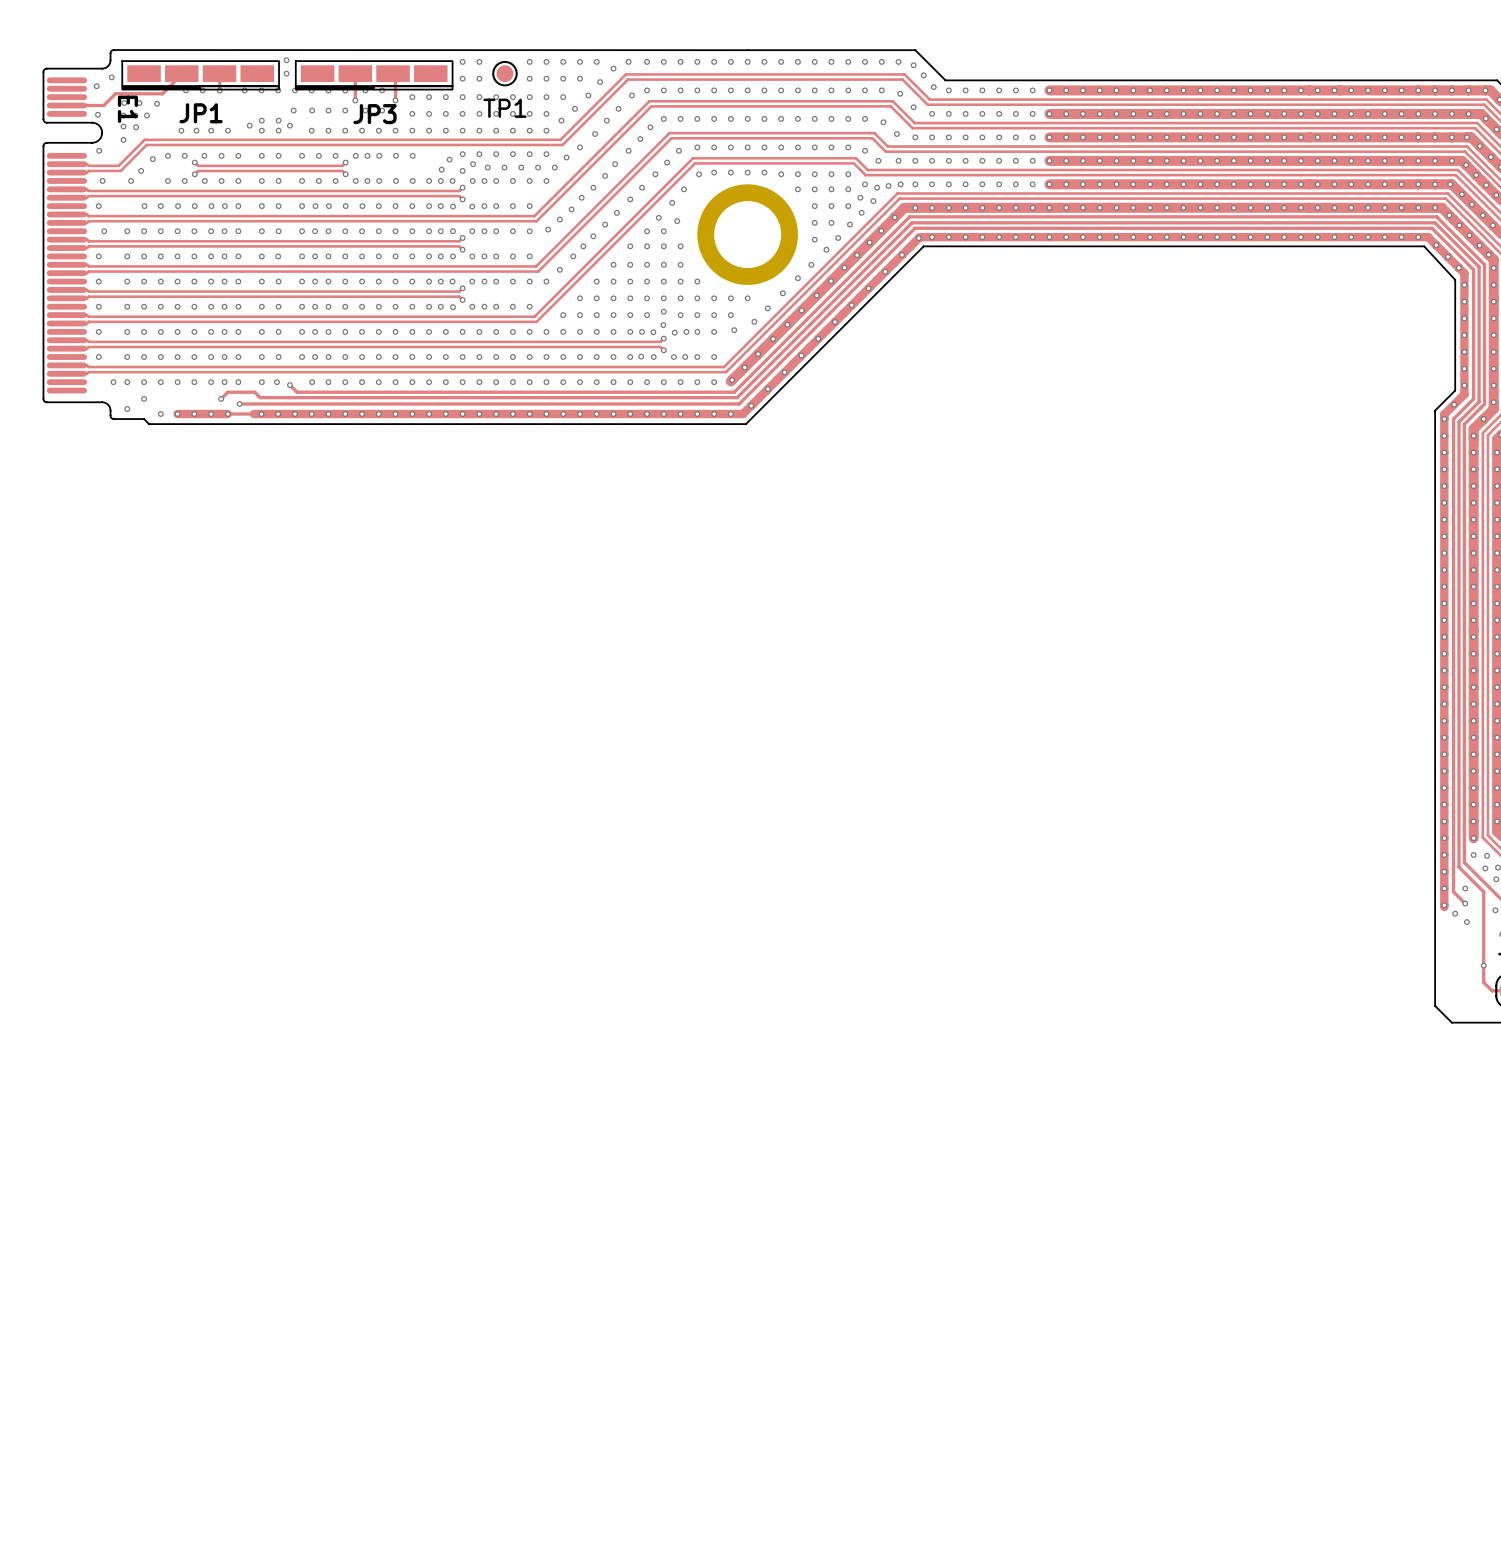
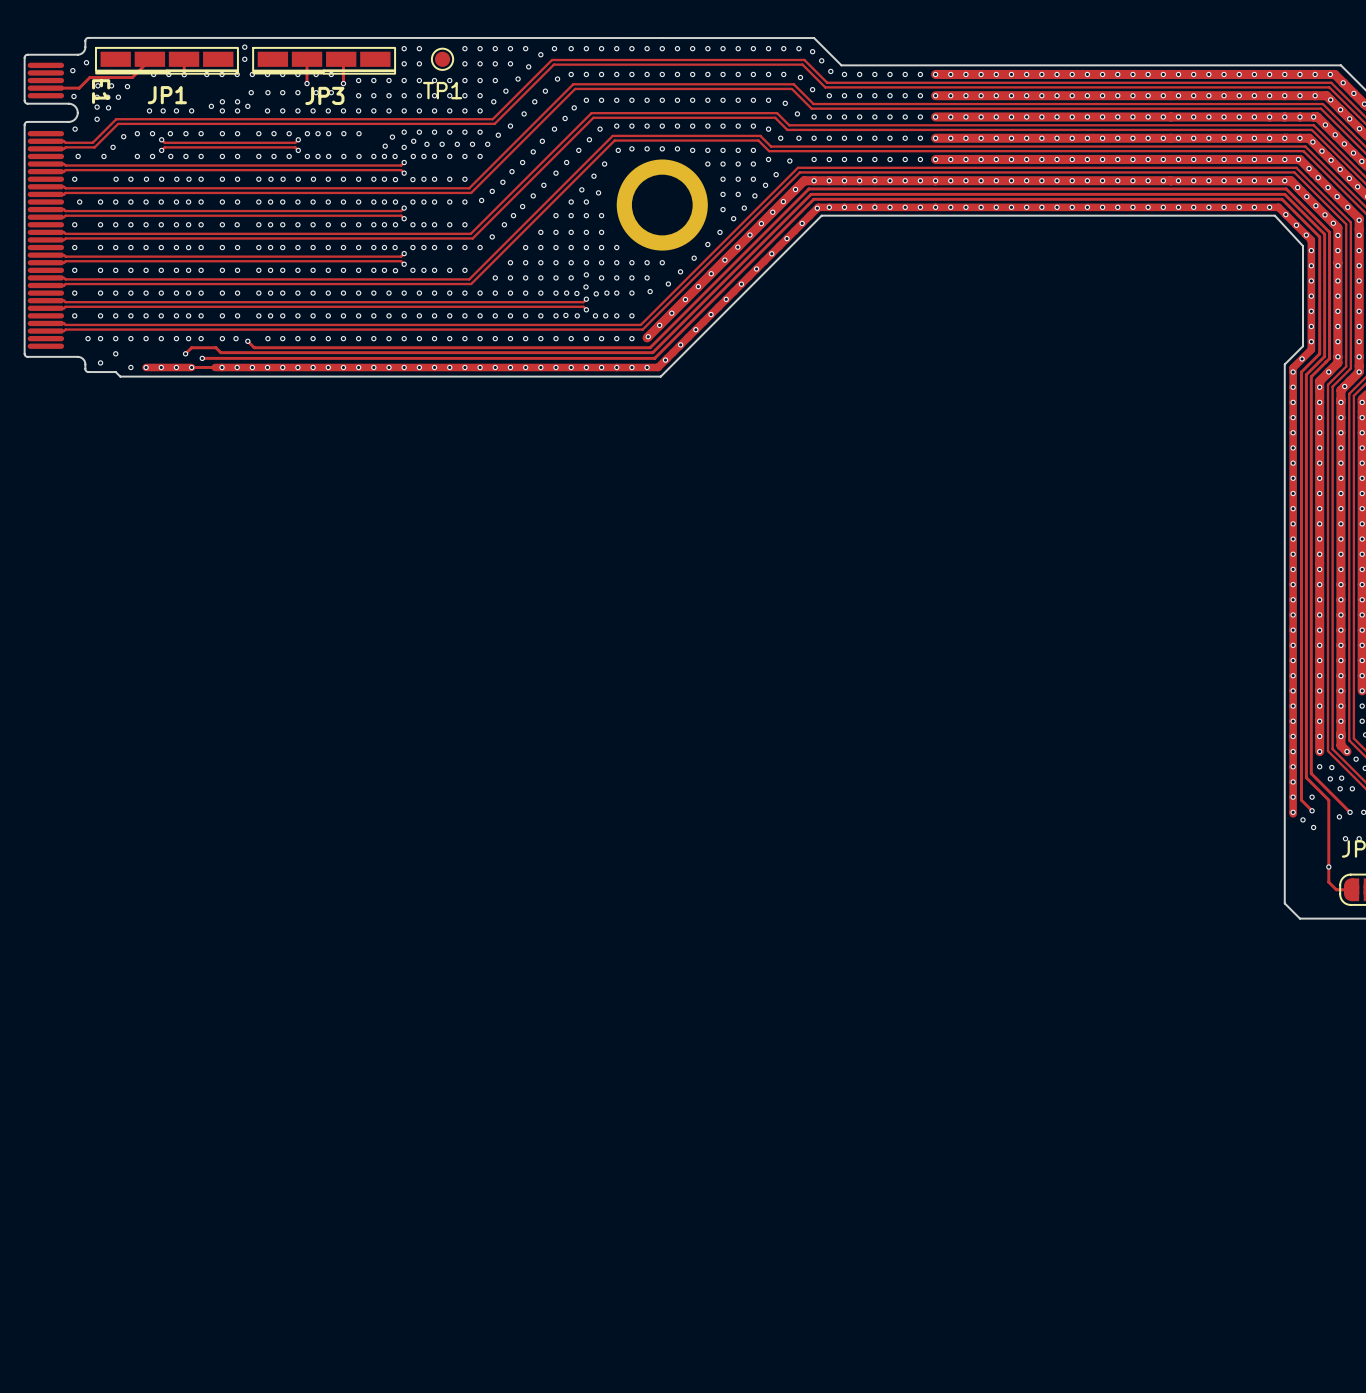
via: (900, 184) -> none
via: (877, 187) -> none
via: (860, 197) -> none

